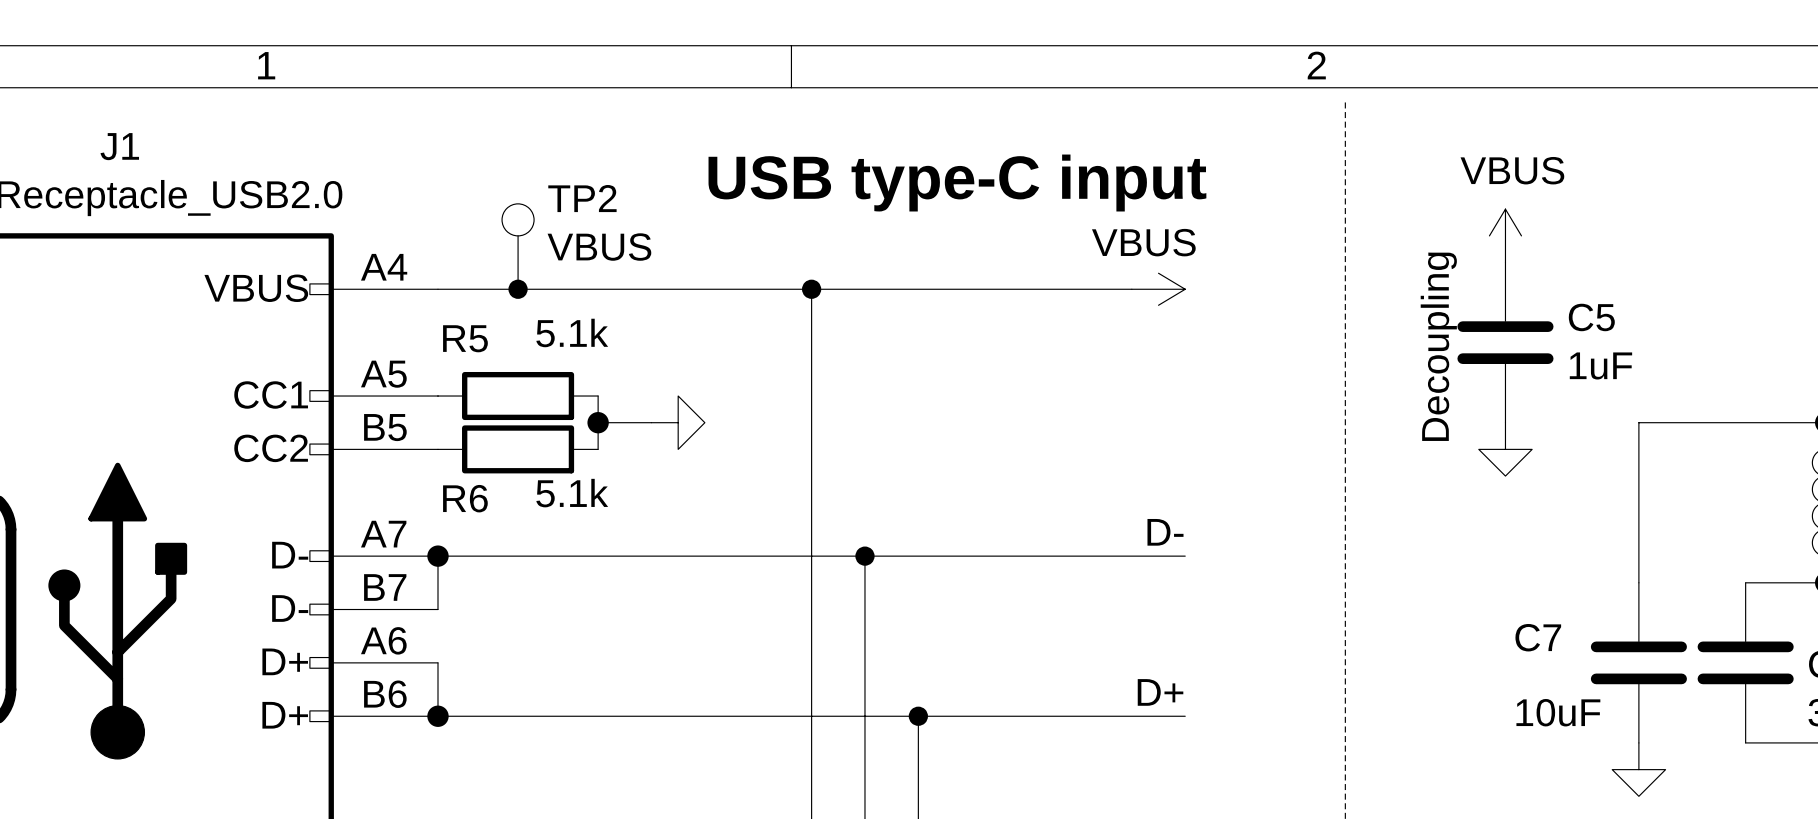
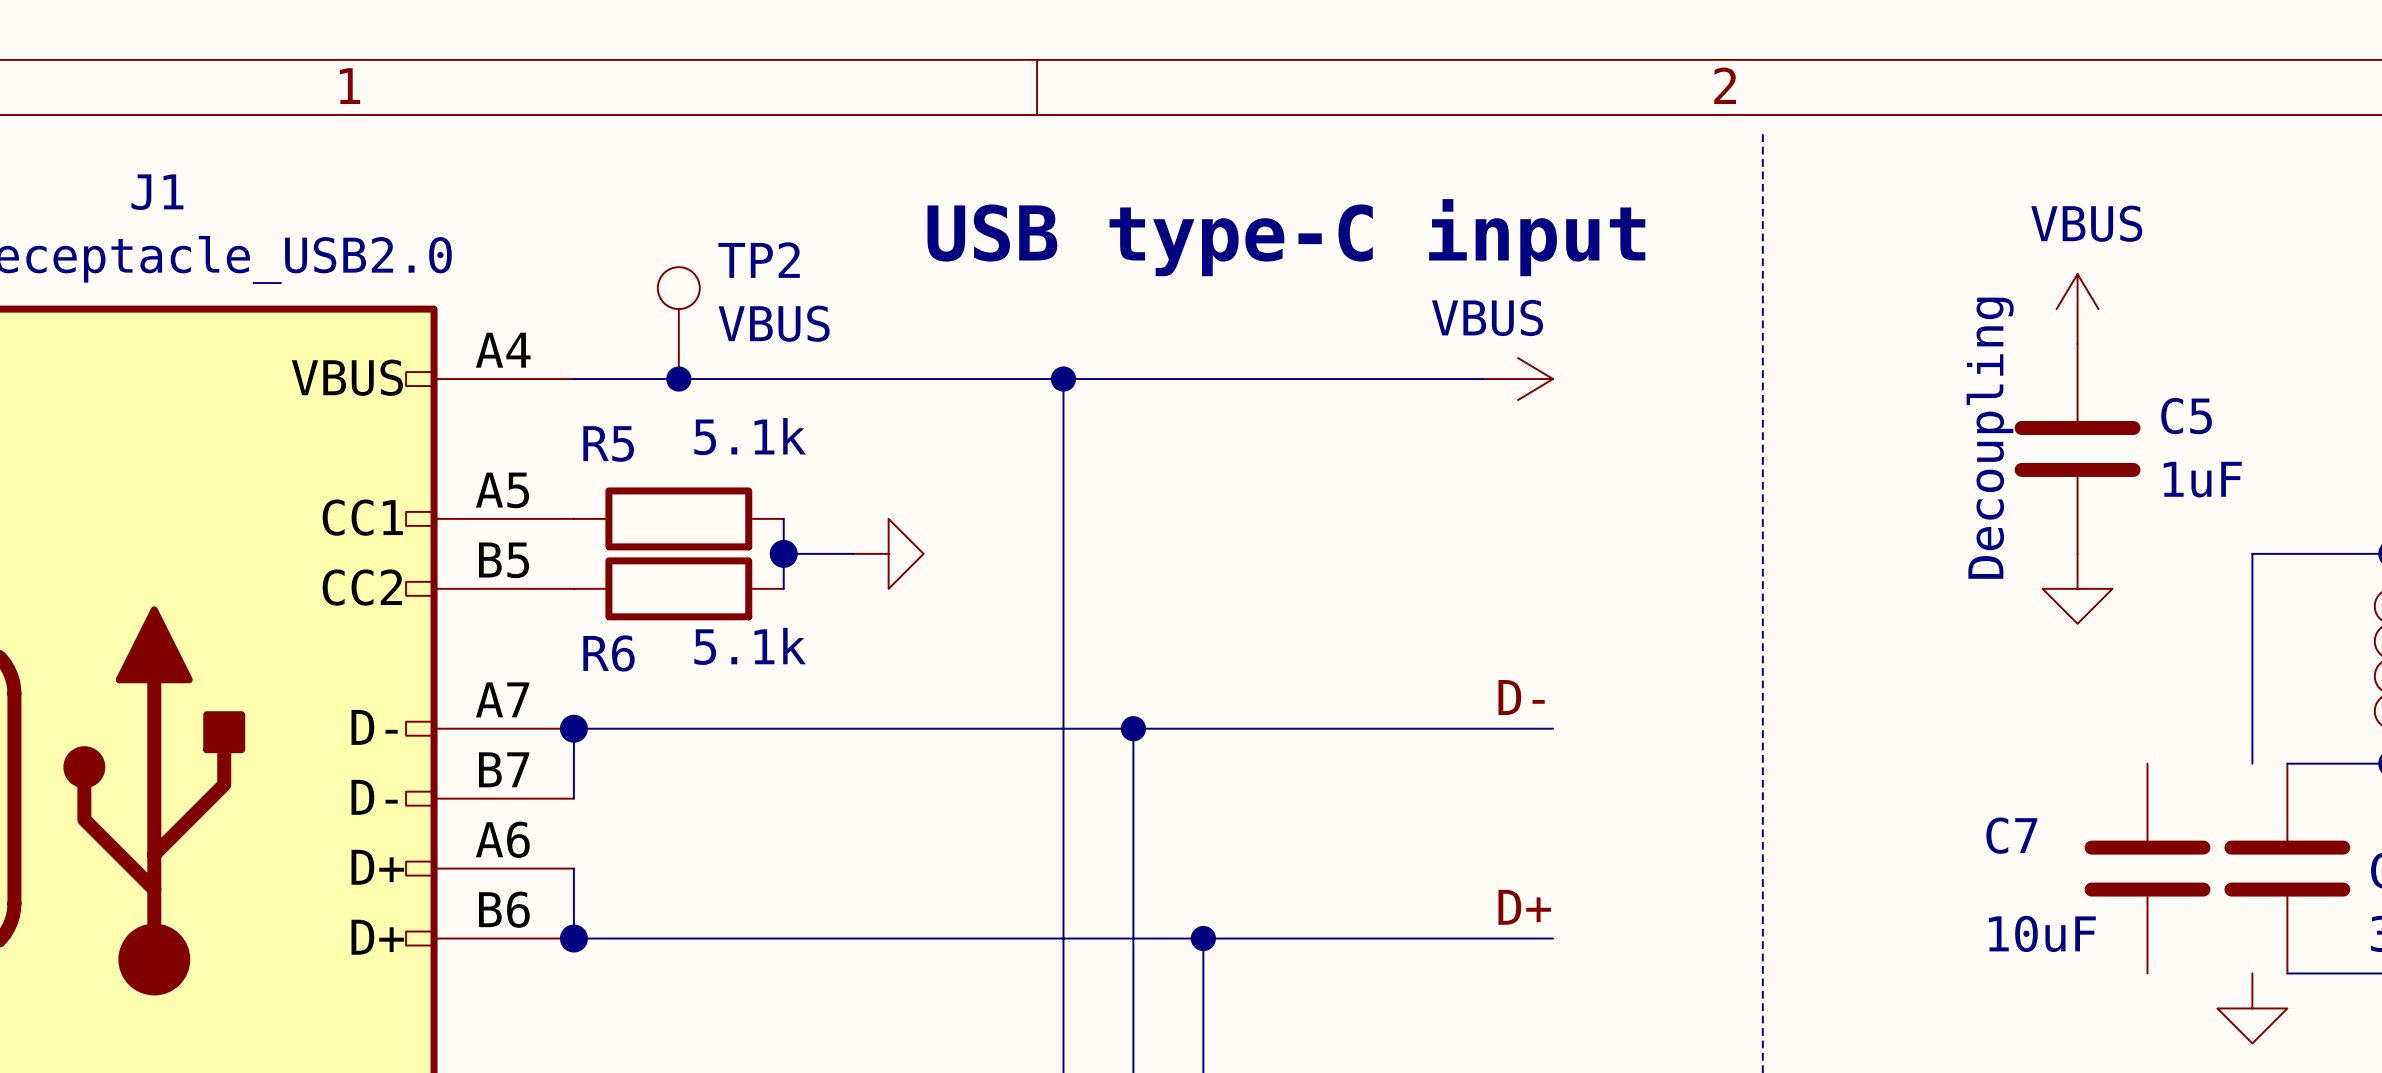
power symbol position: VBUS (1505, 235) -> VBUS (2077, 309)
C5 position: (1505, 342) -> (2077, 448)
text position: Decoupling (1438, 346) -> Decoupling (1990, 438)
wire: (1718, 422) (1638, 422) (1638, 582) -> (2252, 553) (2252, 763)
power symbol position: (1505, 449) -> (2077, 588)
power symbol position: (1638, 769) -> (2252, 1008)

